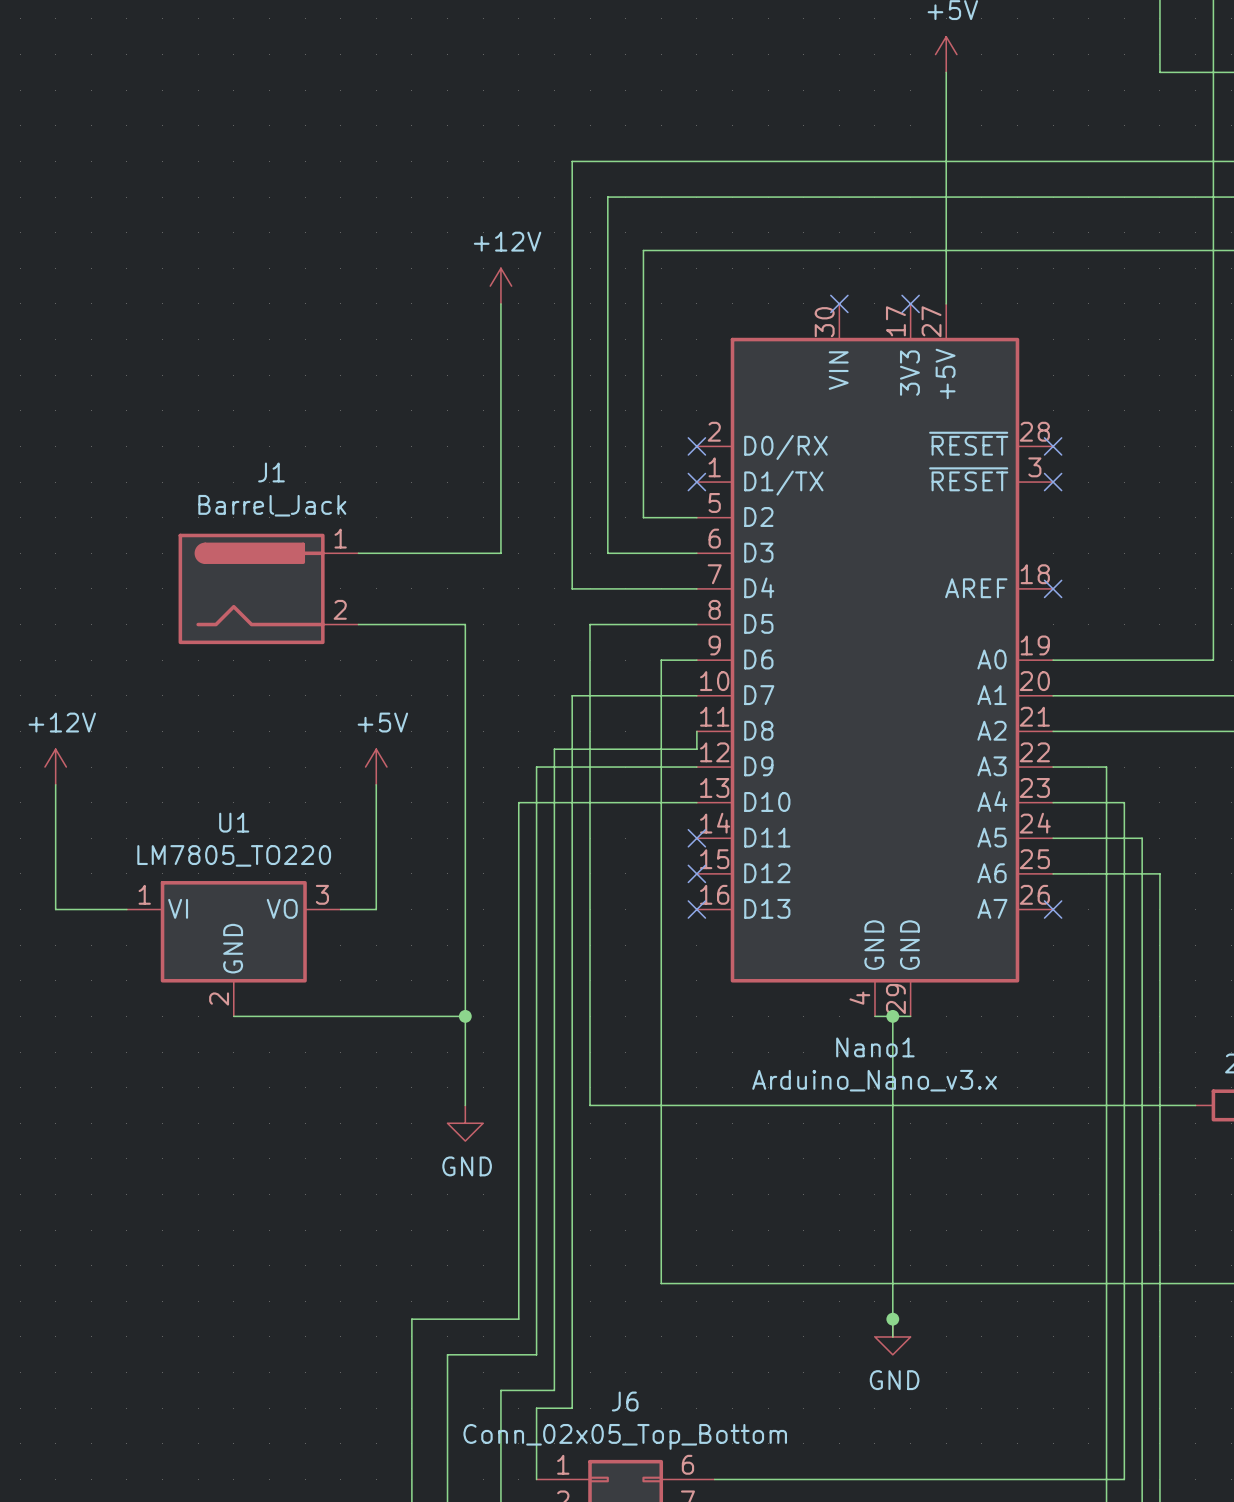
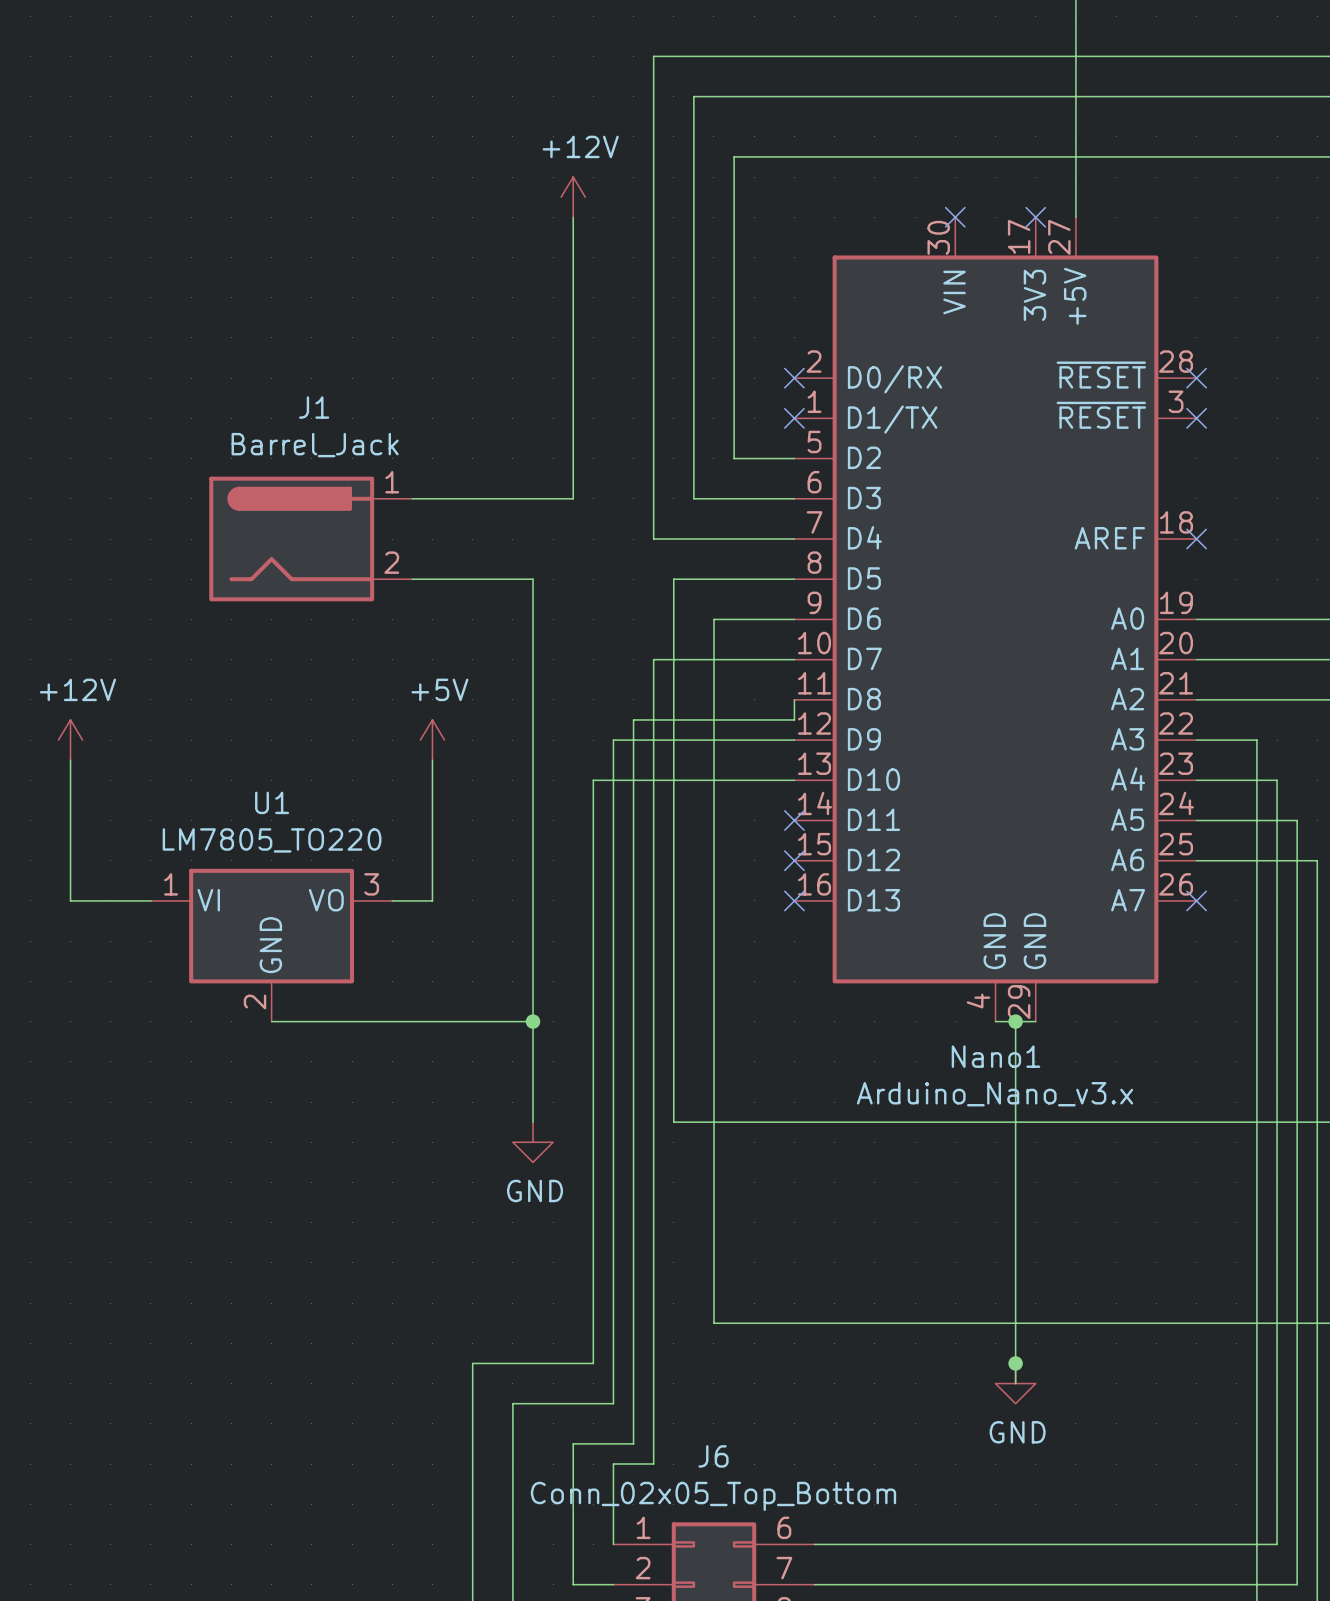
wire: (661, 660) (661, 1283) -> (754, 619) (713, 619) (713, 1323) (754, 1323)

